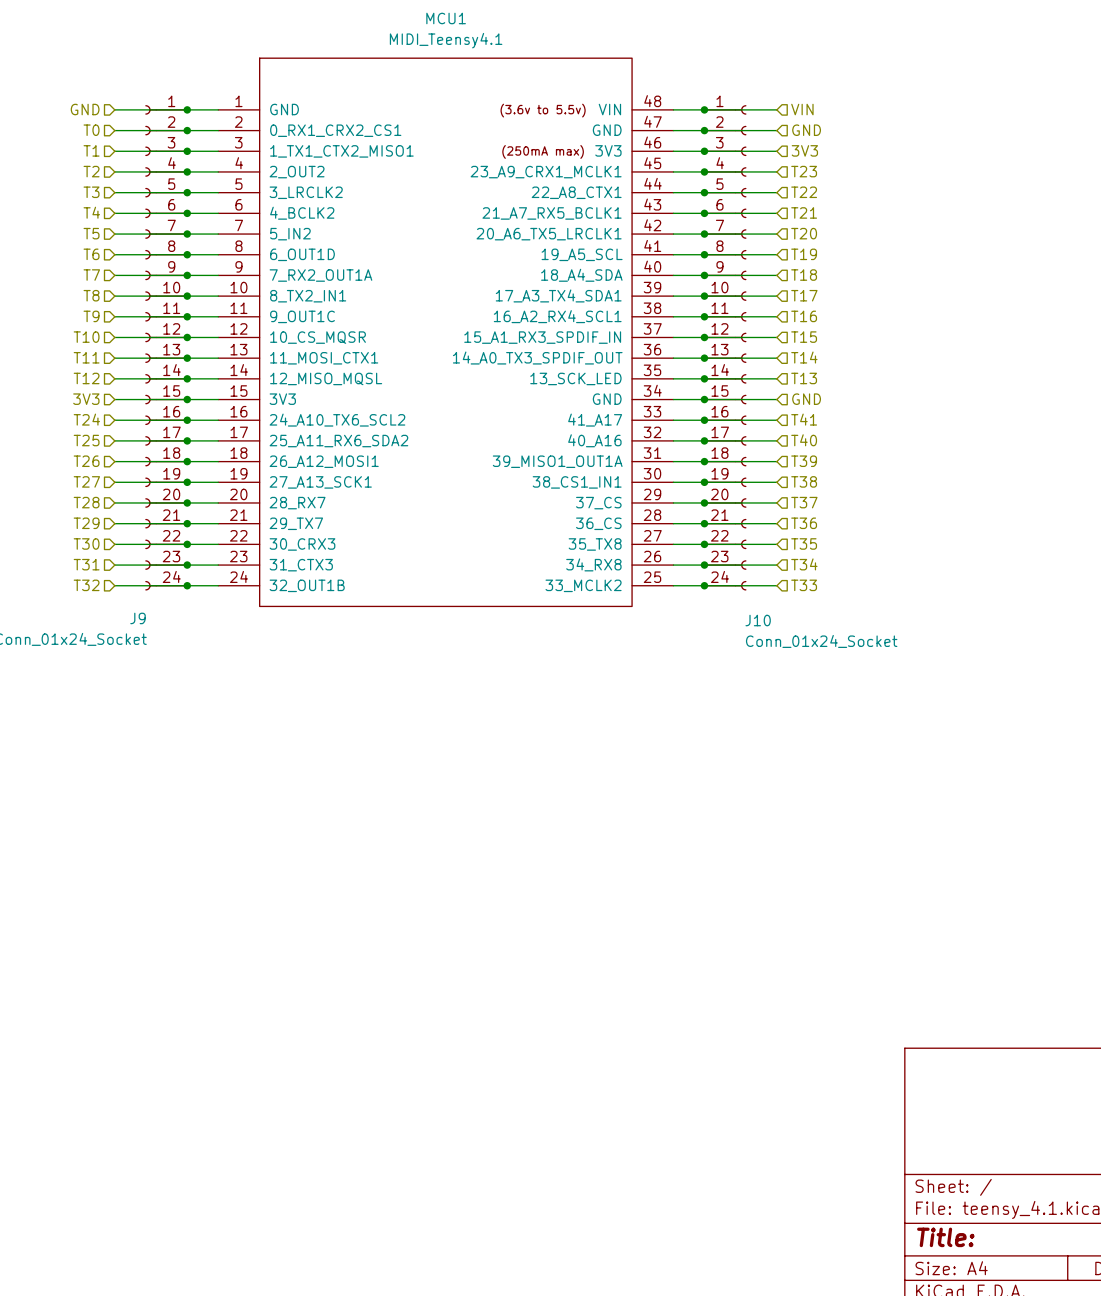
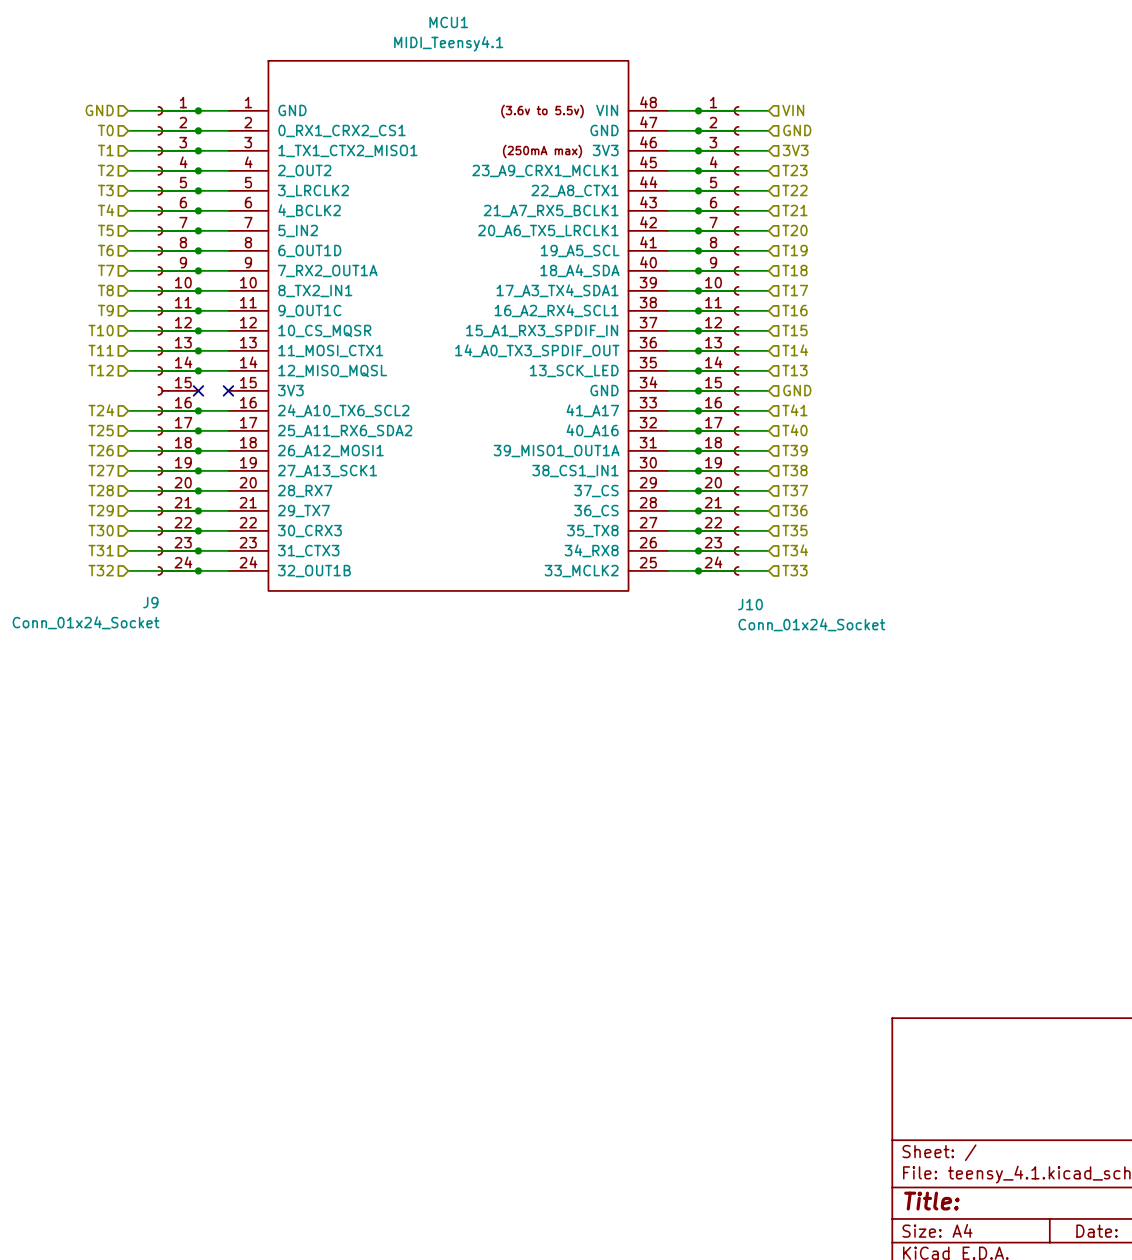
hierarchical label: 3V3 (86, 399) -> none
wire: (114, 399) (218, 399) -> none
junction: (187, 399) -> none
no-connect mark: none -> (198, 390)
no-connect mark: none -> (228, 390)

